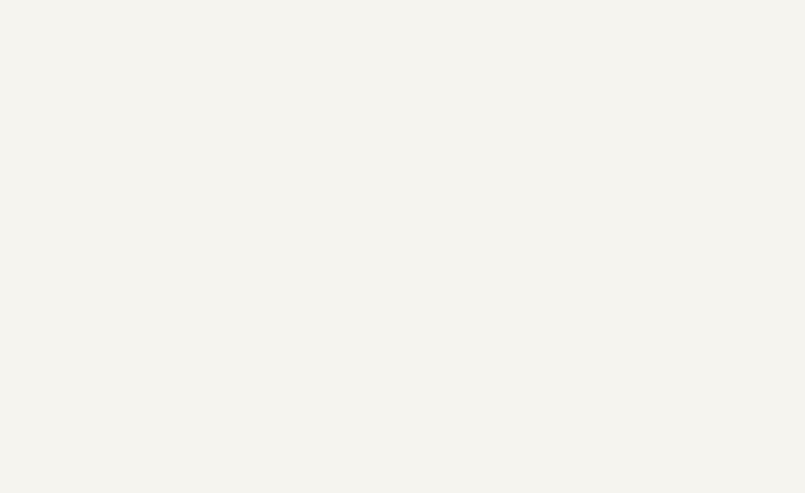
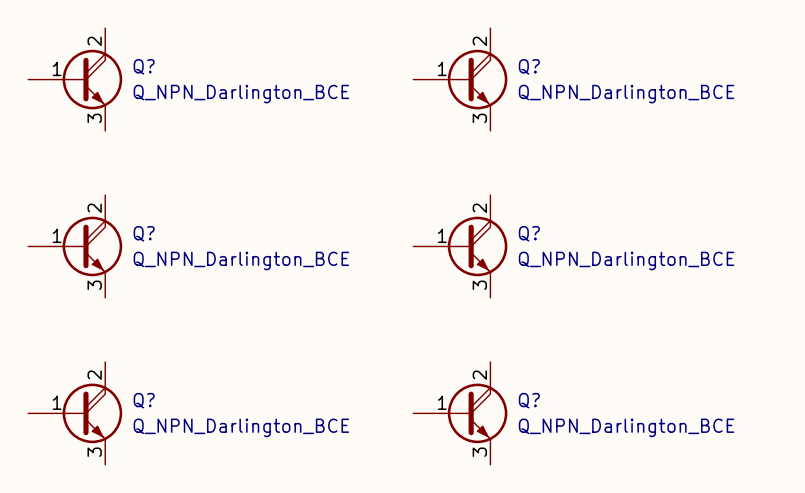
Q?: none -> Q_NPN_Darlington_BCE (75, 79)
Q?: none -> Q_NPN_Darlington_BCE (460, 79)
Q?: none -> Q_NPN_Darlington_BCE (75, 246)
Q?: none -> Q_NPN_Darlington_BCE (460, 246)
Q?: none -> Q_NPN_Darlington_BCE (75, 413)
Q?: none -> Q_NPN_Darlington_BCE (460, 413)

